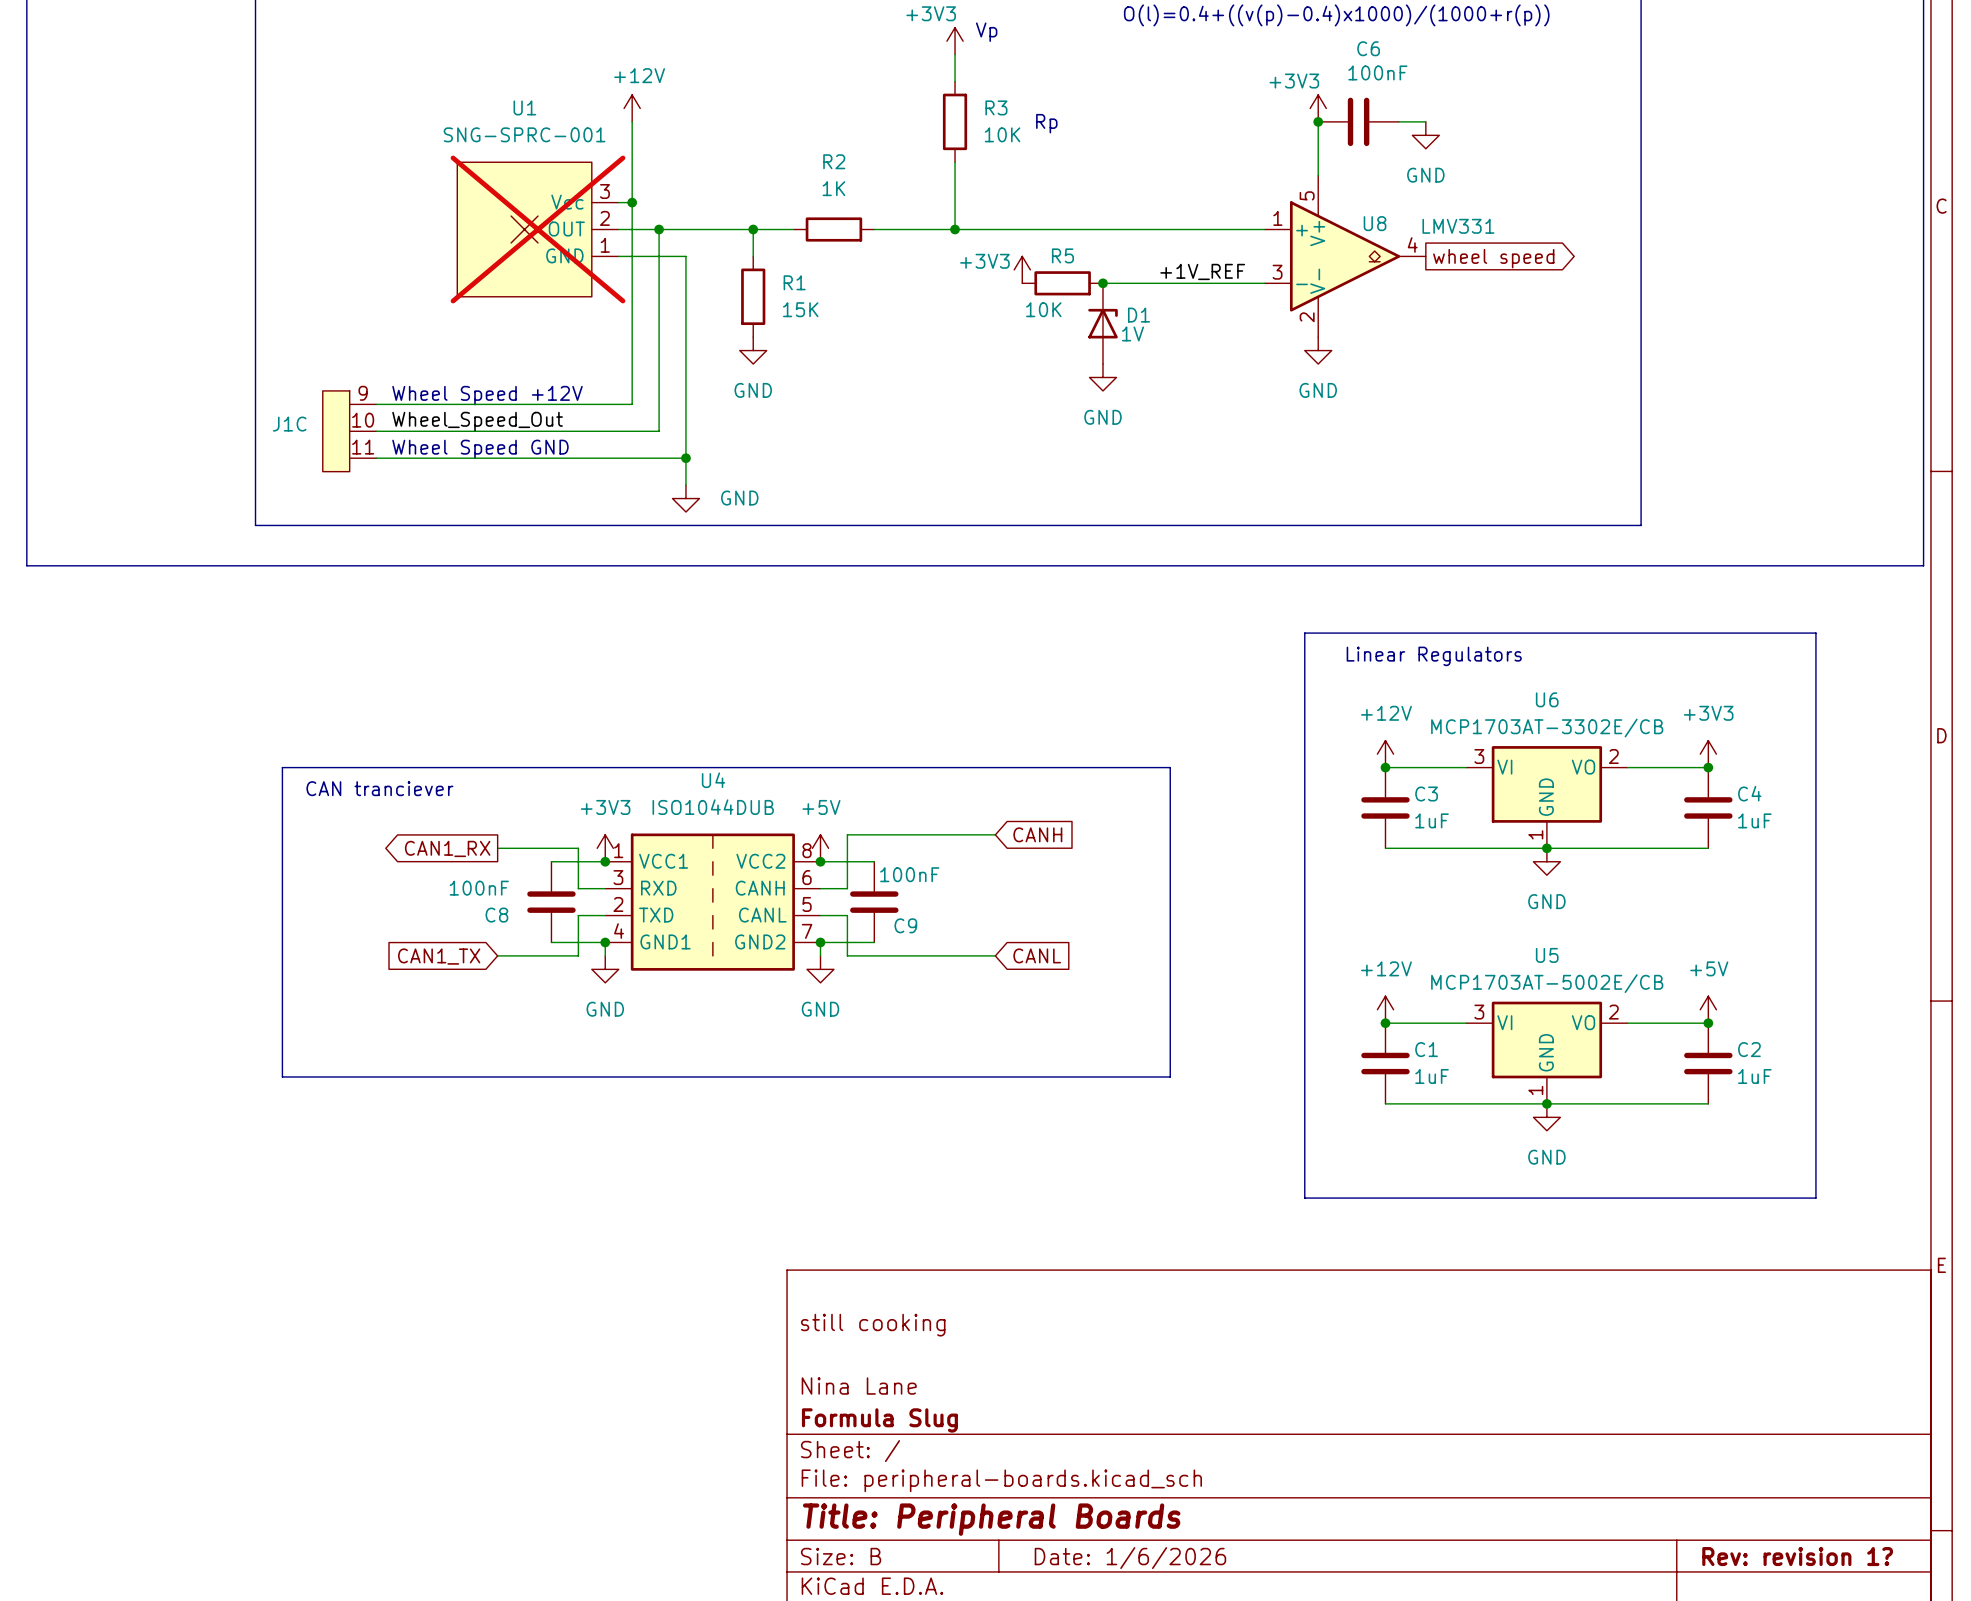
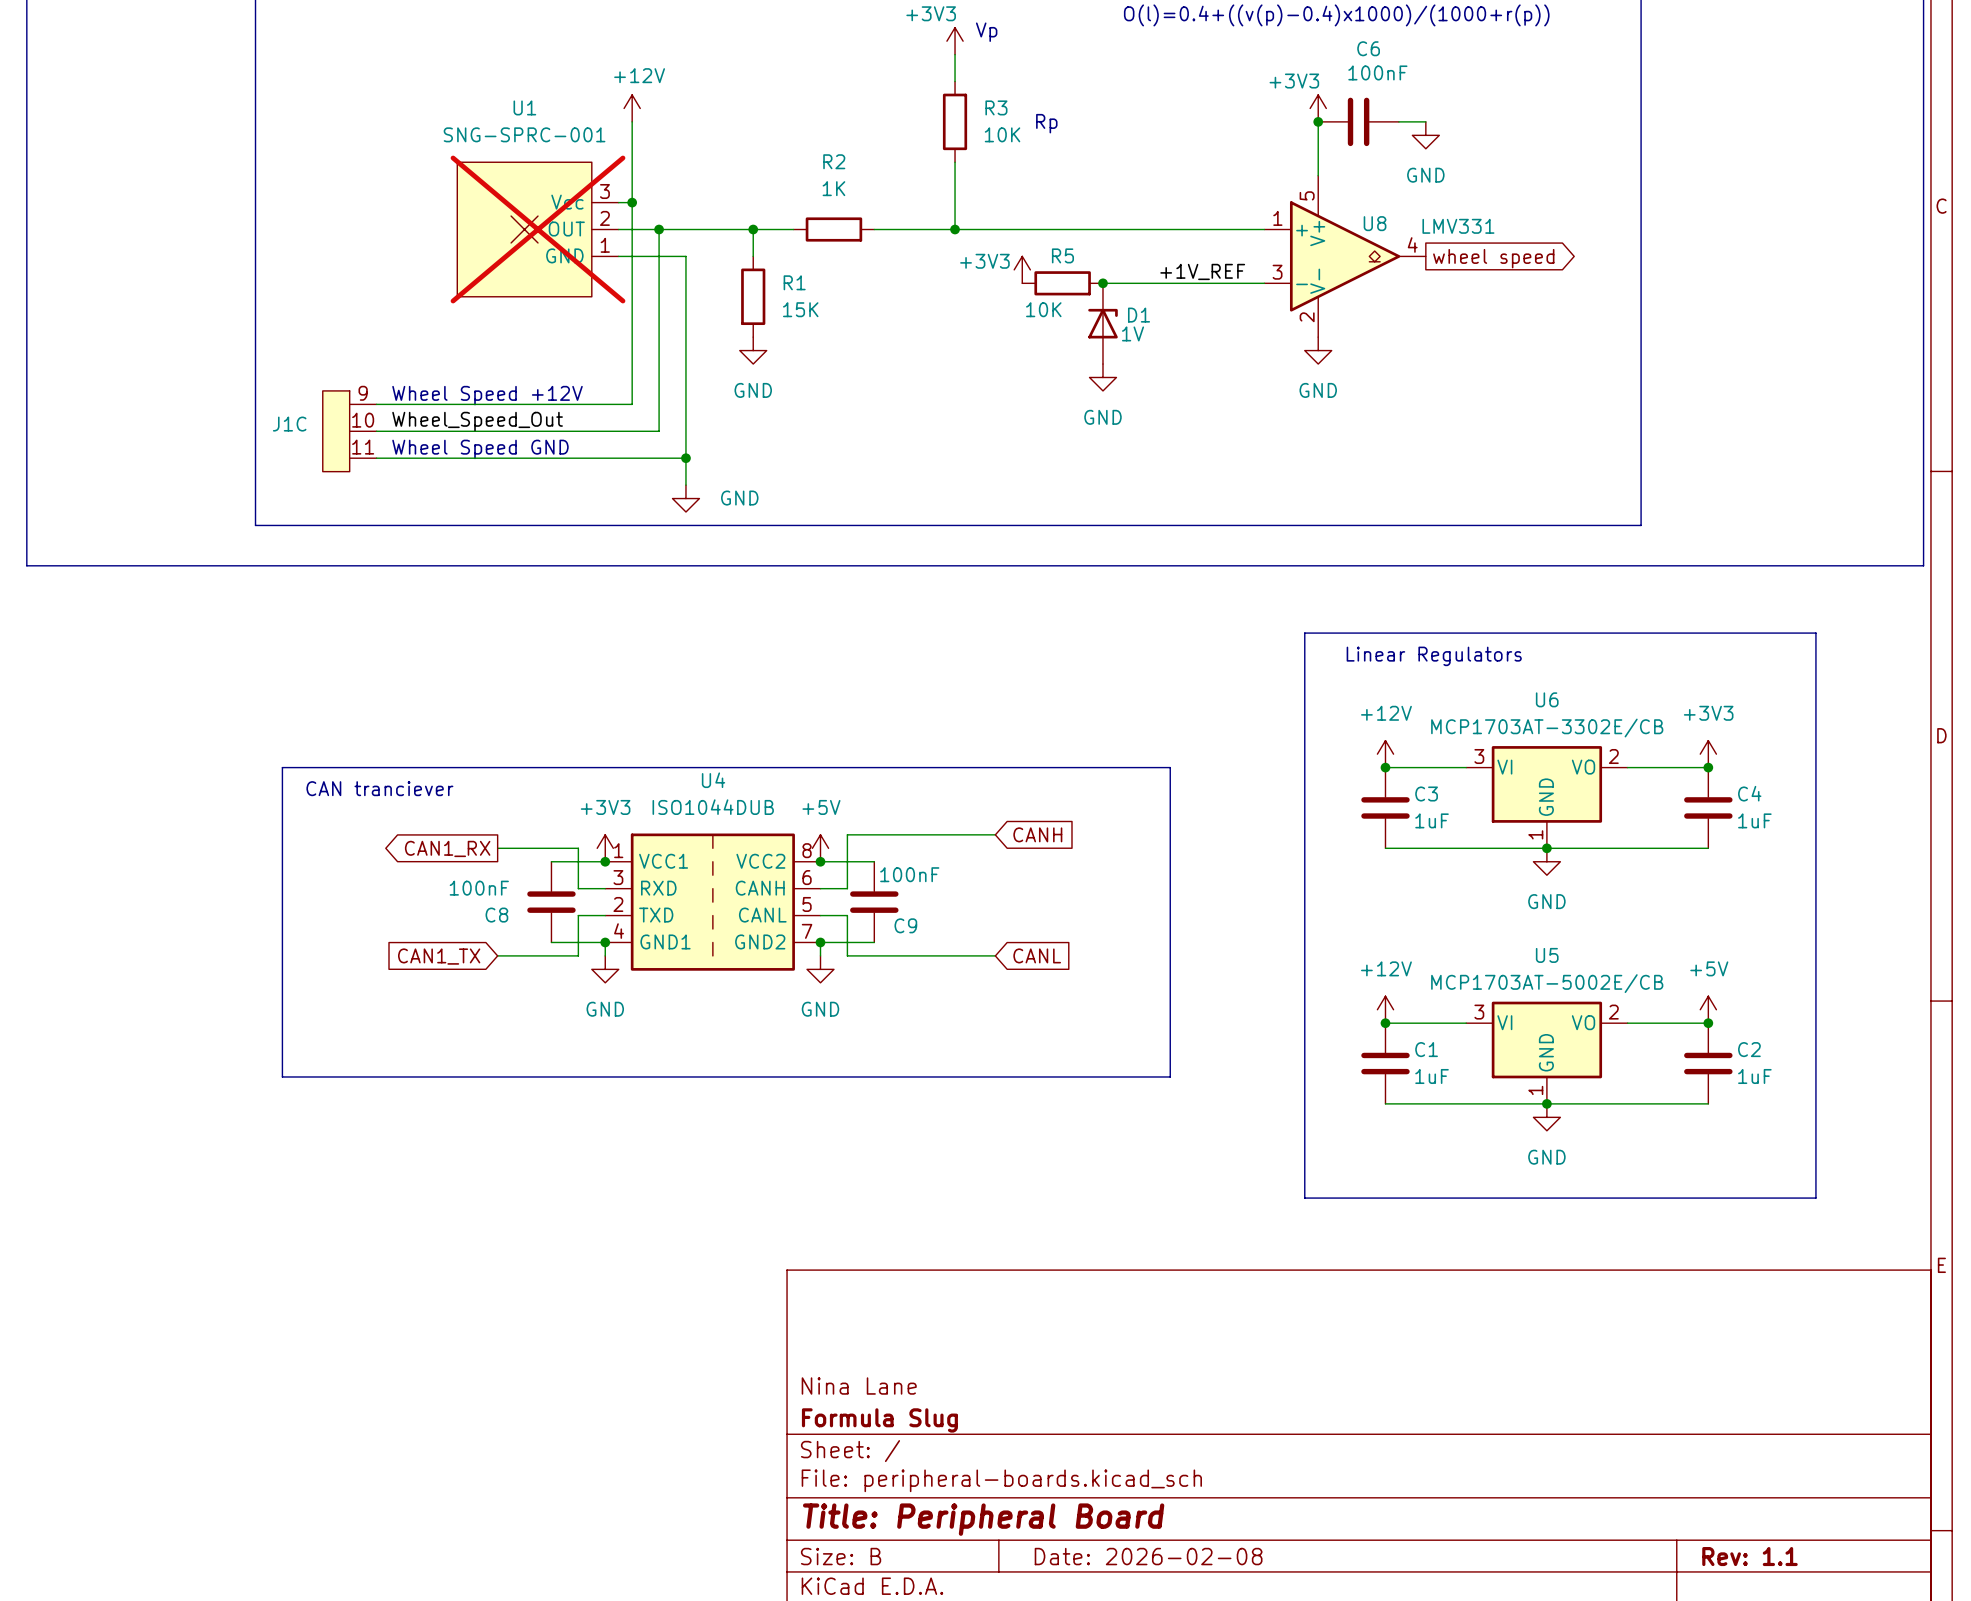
title block: still cooking (873, 1325) -> none
title block: Title: Peripheral Boards (991, 1519) -> Title: Peripheral Board (983, 1519)
title block: Rev: revision 1? (1797, 1556) -> Rev: 1.1 (1749, 1556)
title block: Date: 1/6/2026 (1130, 1558) -> Date: 2026-02-08 (1148, 1556)

